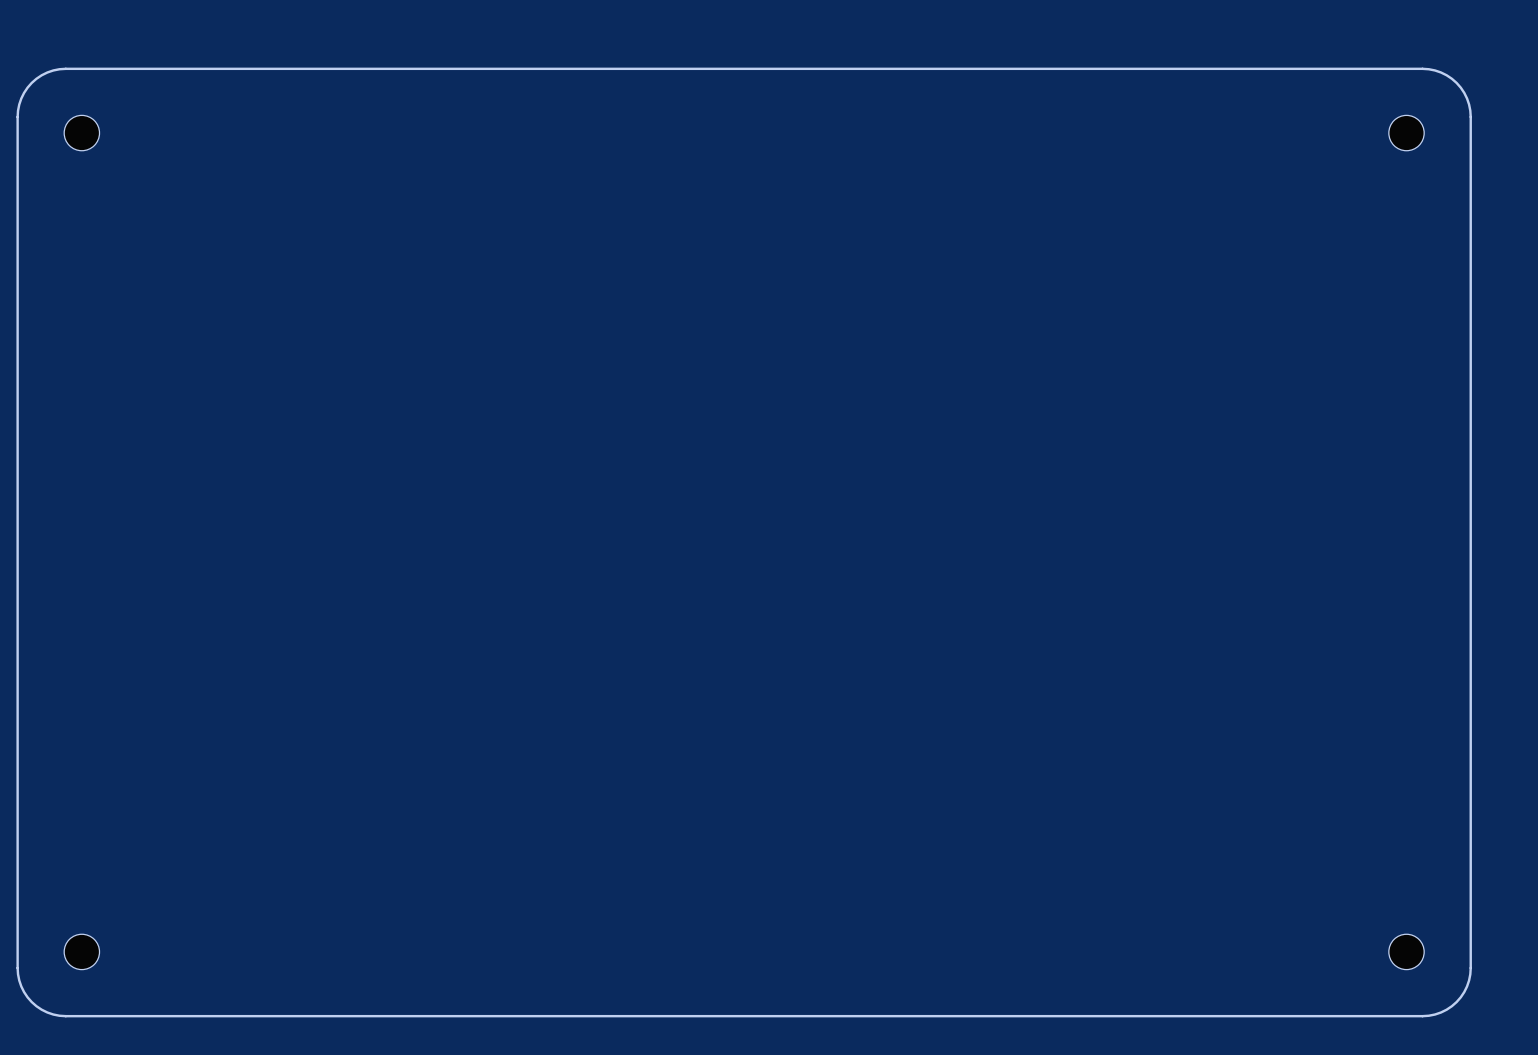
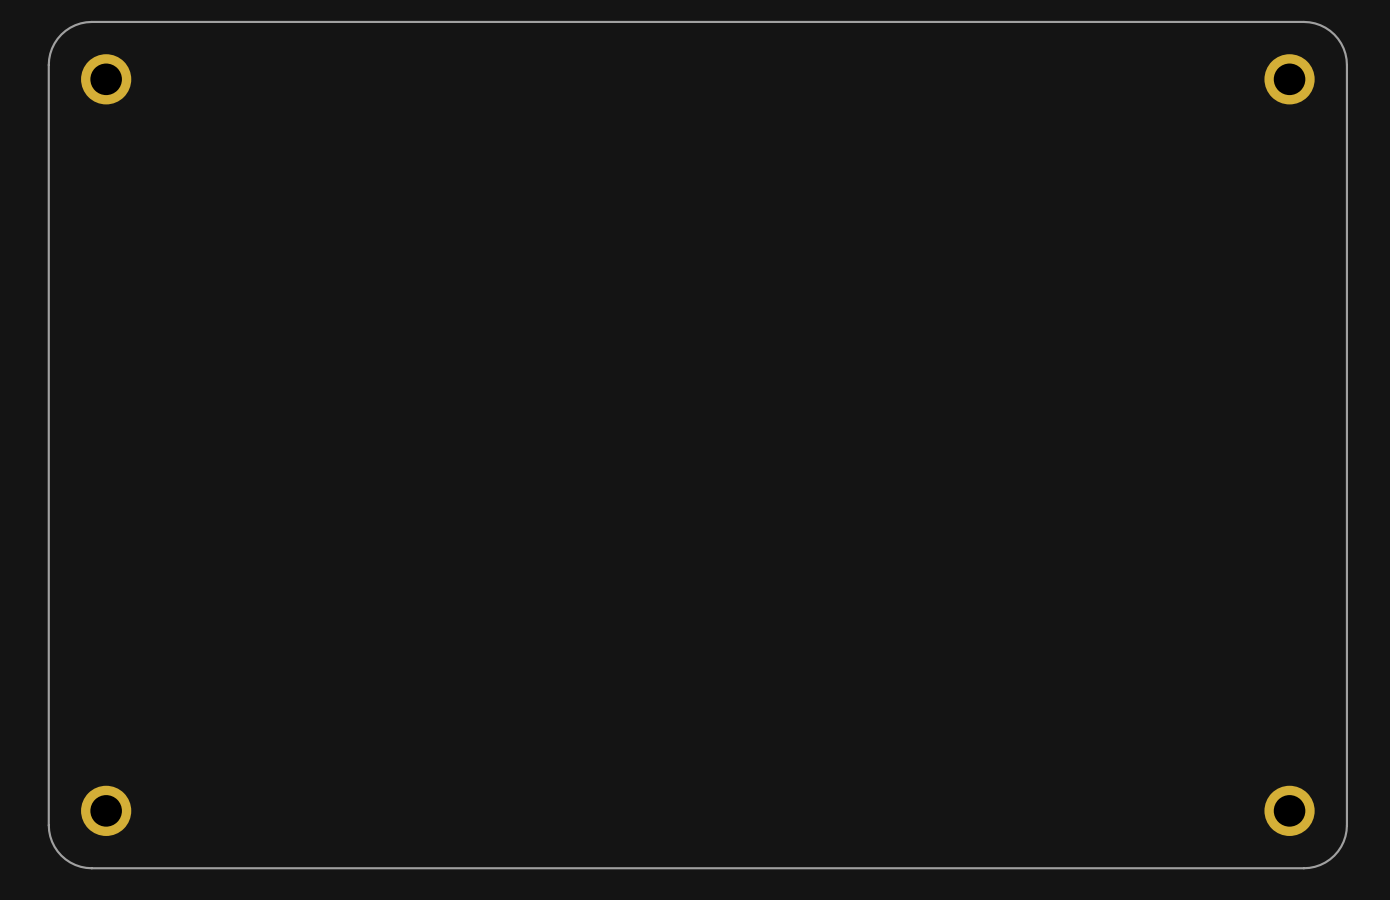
part footprint: [64, 115, 100, 151] -> [81, 54, 132, 105]
part footprint: [1388, 115, 1425, 151] -> [1264, 54, 1315, 105]
part footprint: [64, 934, 100, 970] -> [81, 785, 132, 836]
part footprint: [1388, 934, 1425, 970] -> [1264, 785, 1315, 836]

